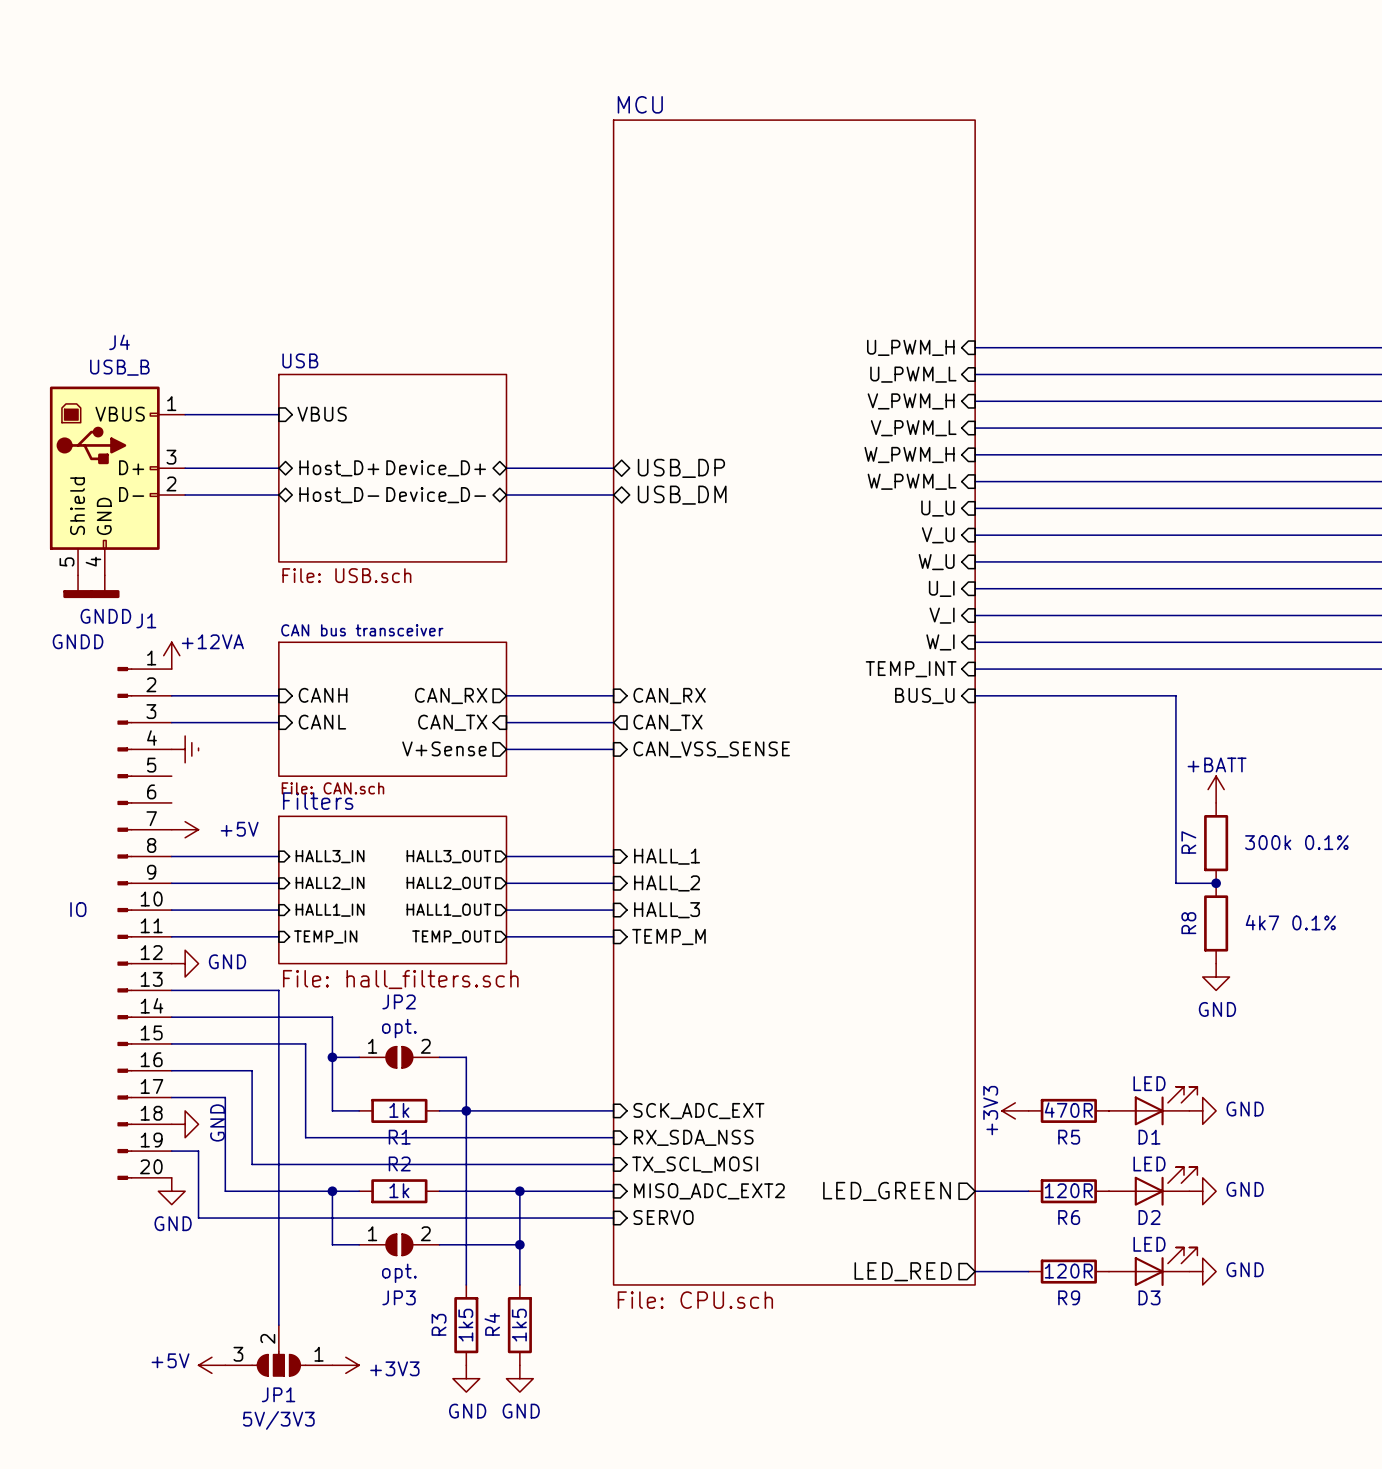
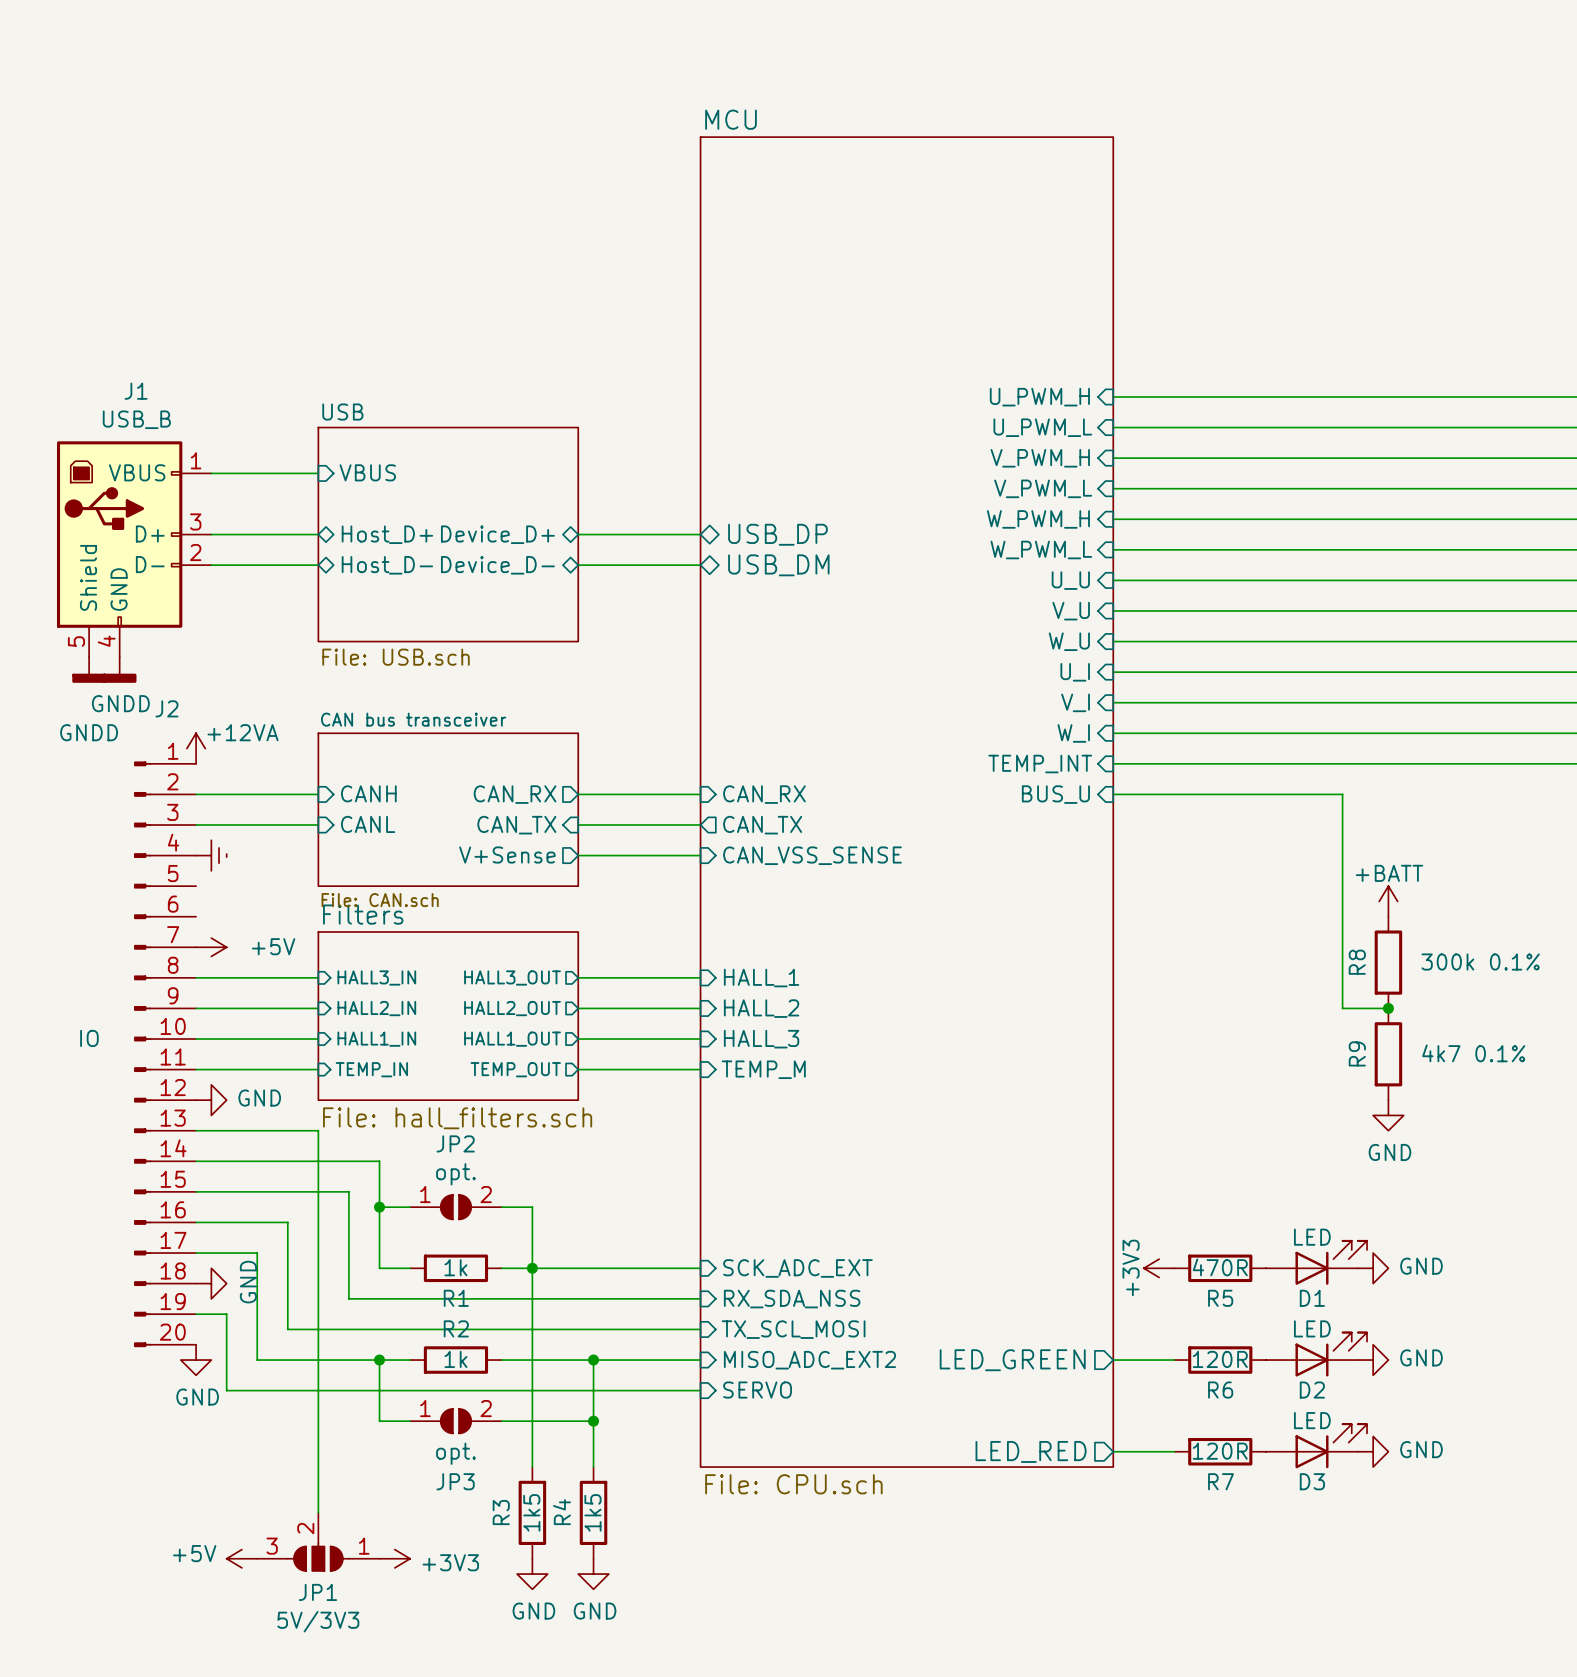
J4 name: J4 (119, 342) -> J1 (136, 391)
J1 name: J1 (146, 620) -> J2 (166, 708)
R7 name: R7 (1188, 842) -> R8 (1357, 962)
R8 name: R8 (1188, 923) -> R9 (1357, 1053)
R9 name: R9 (1069, 1297) -> R7 (1221, 1481)

